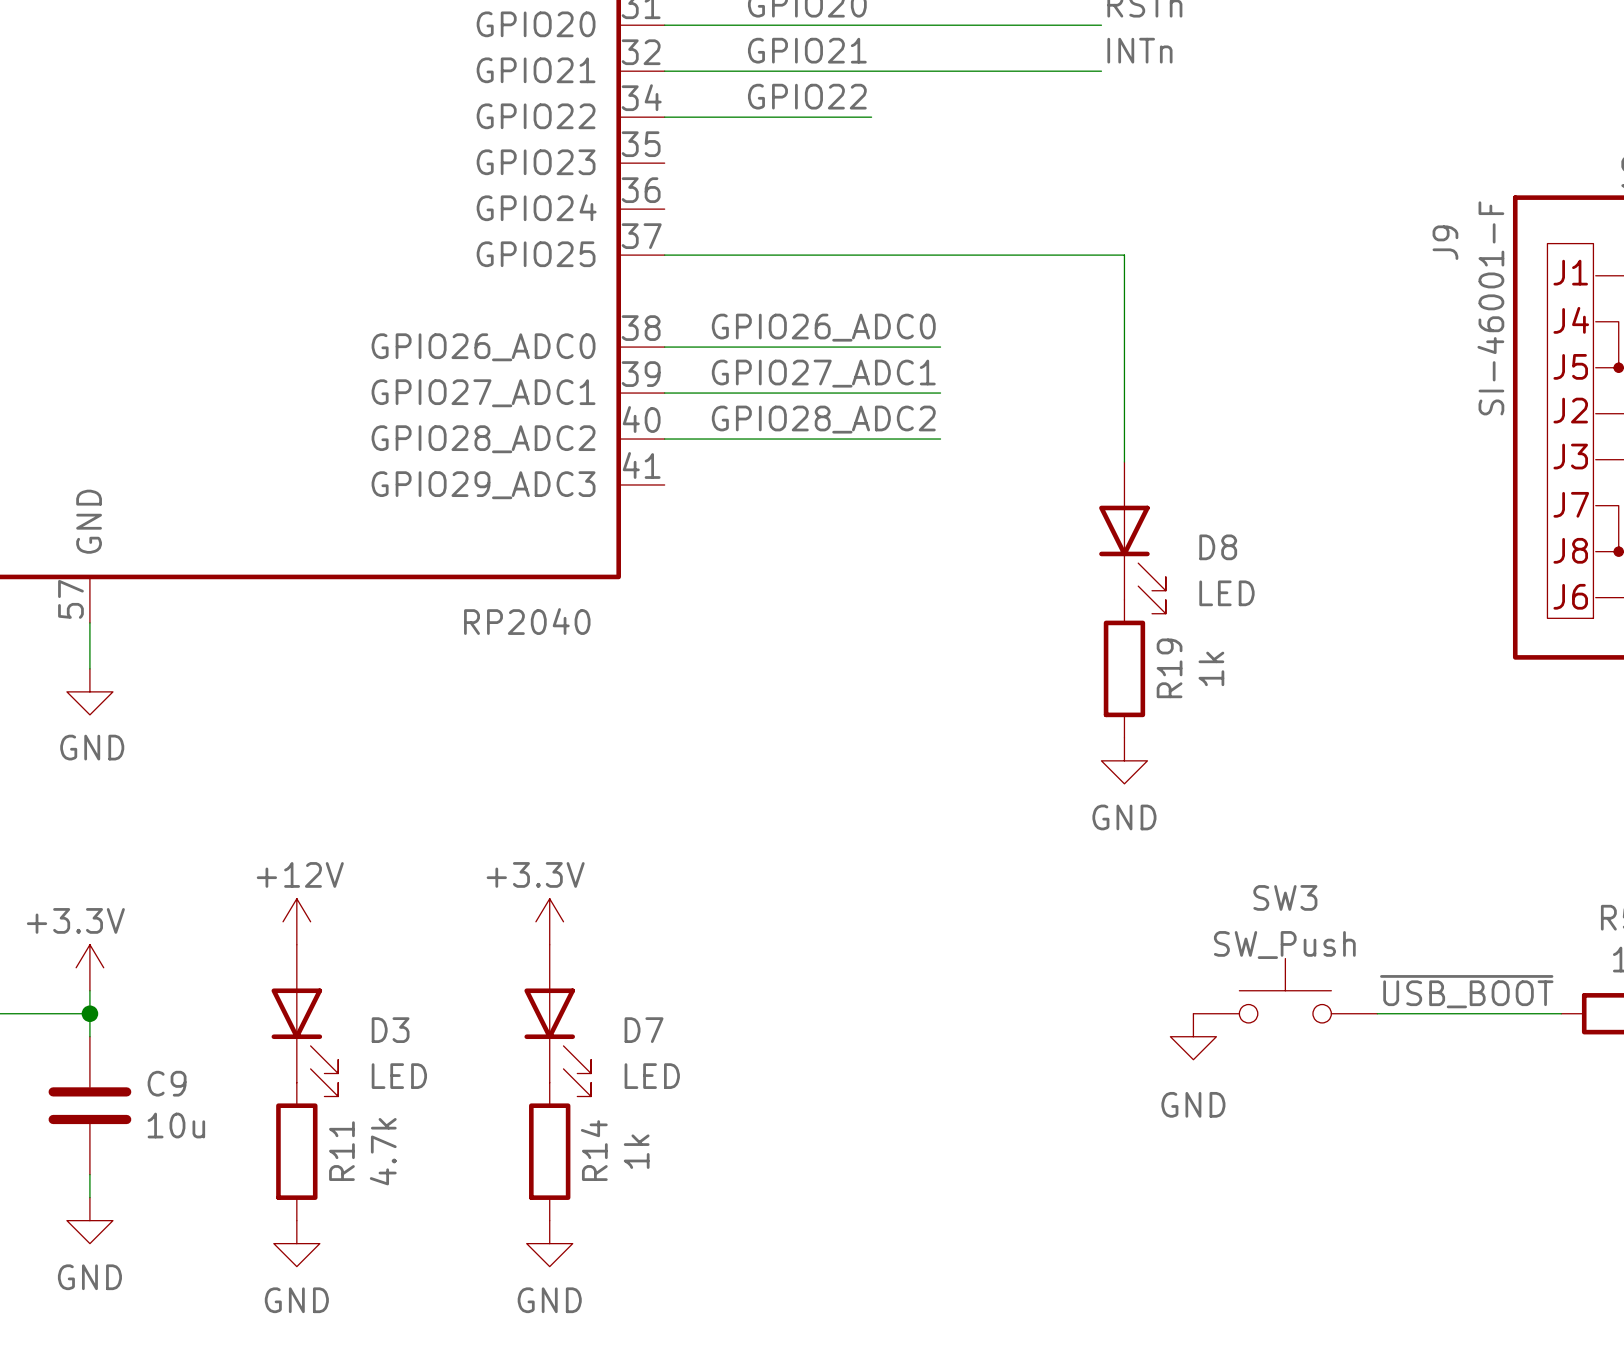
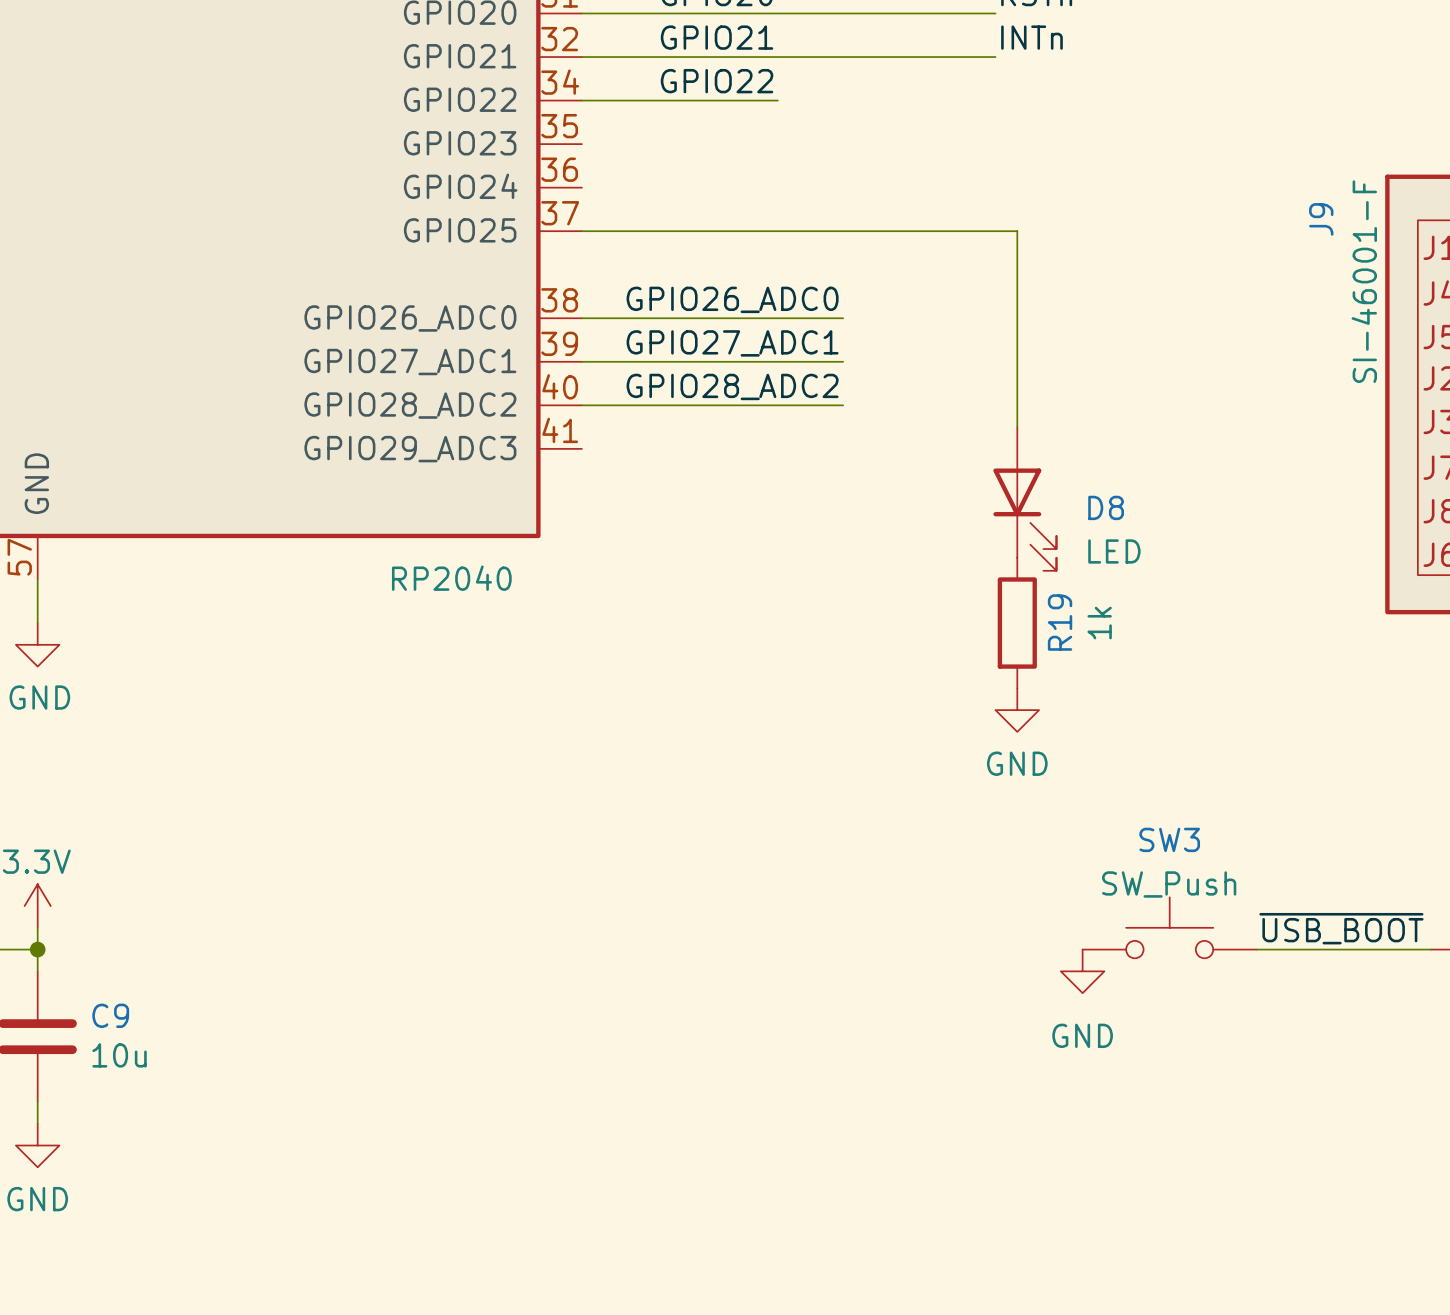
power symbol: +12V (296, 921) -> none
power symbol: +3.3V (549, 921) -> none
D3: LED (304, 1020) -> none
D7: LED (557, 1020) -> none
R11: 4.7k (296, 1151) -> none
R14: 1k (549, 1151) -> none
power symbol: GND (296, 1243) -> none
power symbol: GND (549, 1243) -> none

